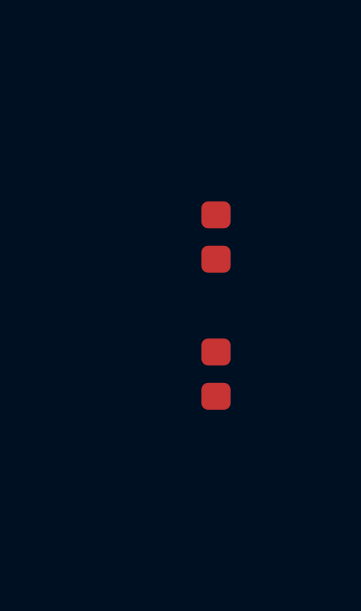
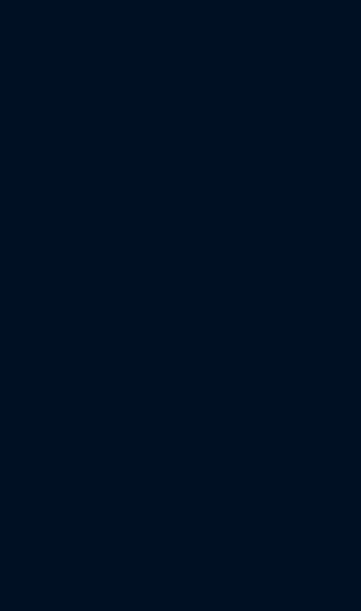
part: (216, 237) -> none
part: (216, 374) -> none

